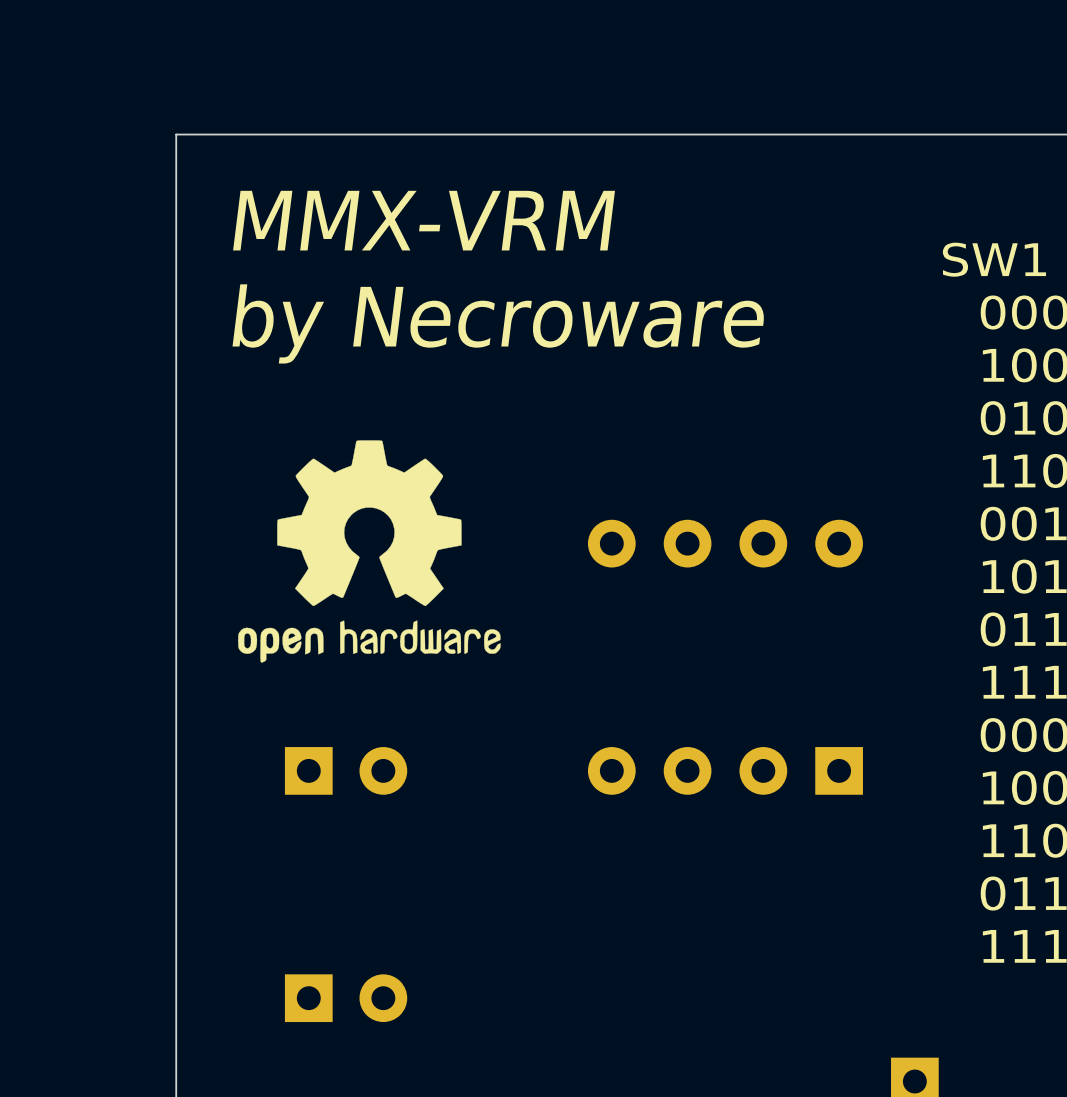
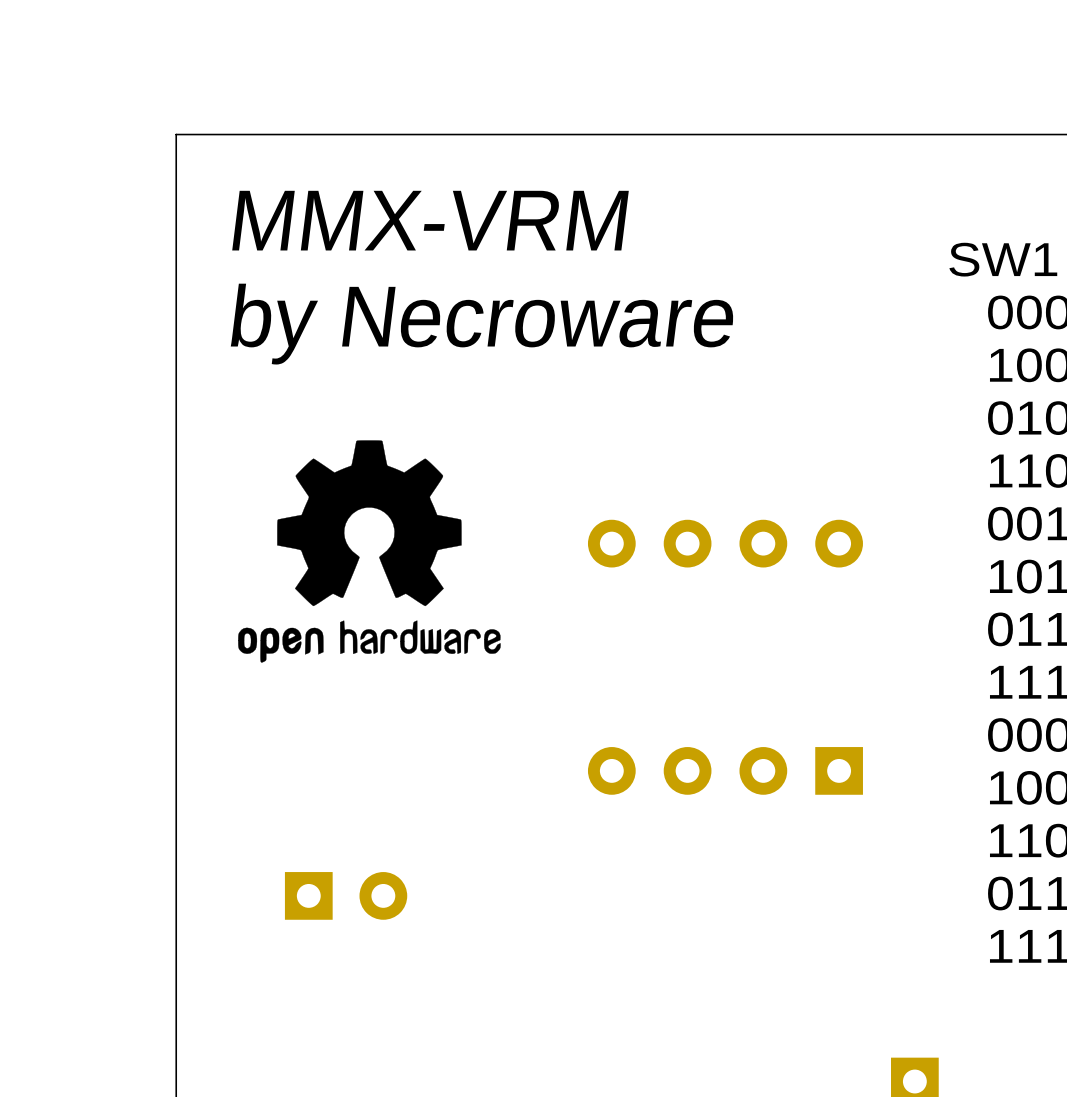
part: (346, 770) -> none
part: none -> (346, 895)
part: (346, 998) -> none

